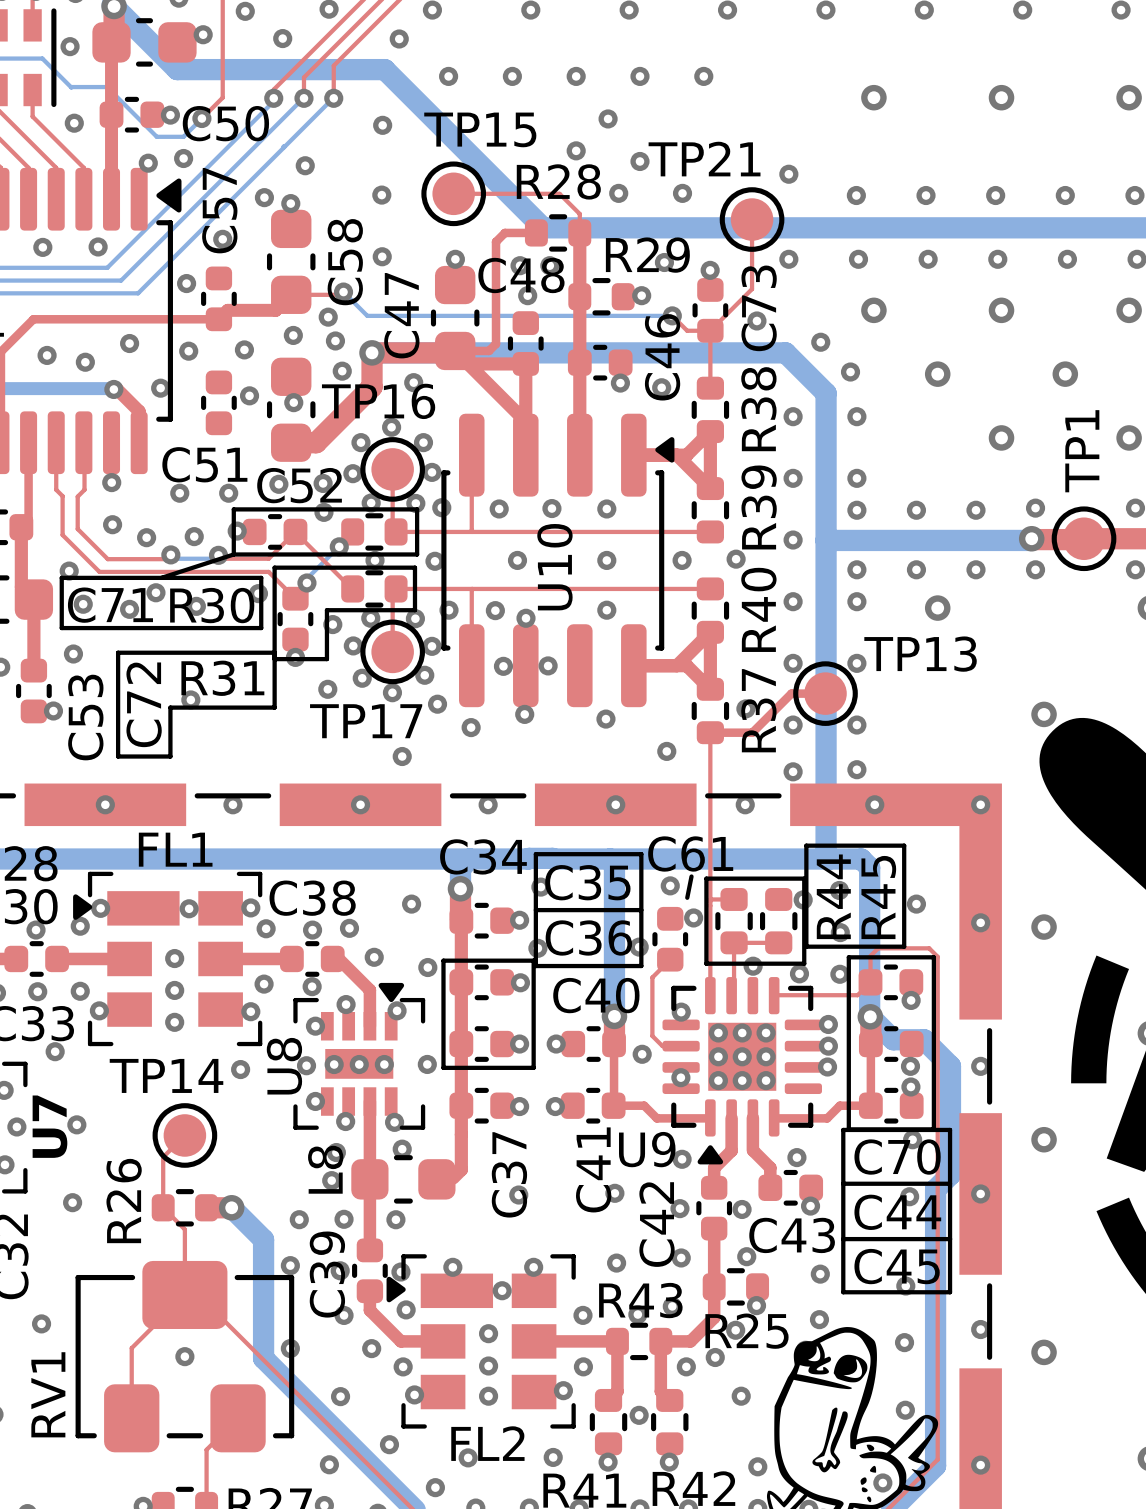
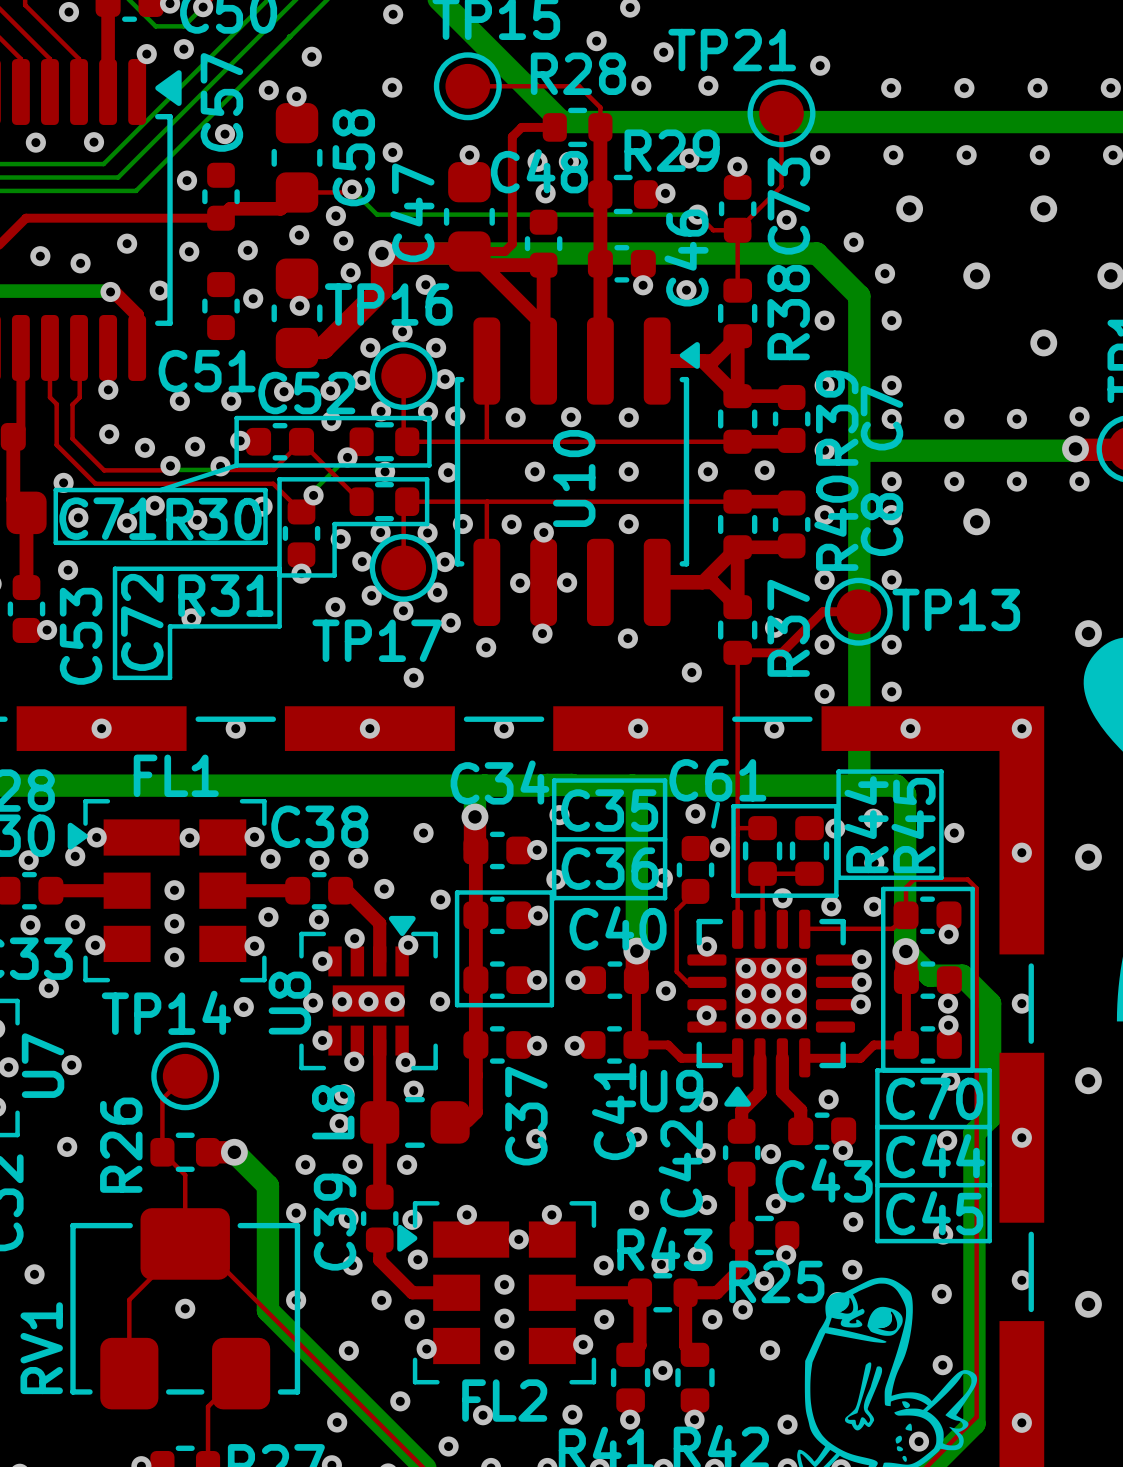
top track: none -> (737, 396) (791, 397)
R39 name position: R39 (759, 507) -> R39 (837, 418)
C7: none -> (791, 418)
top track: none -> (791, 440) (737, 441)
top track: none -> (737, 501) (791, 503)
R40 name position: R40 (758, 609) -> R40 (836, 523)
C8: none -> (791, 524)
top track: none -> (791, 545) (737, 547)
TP13 name position: TP13 (920, 654) -> TP13 (956, 609)

